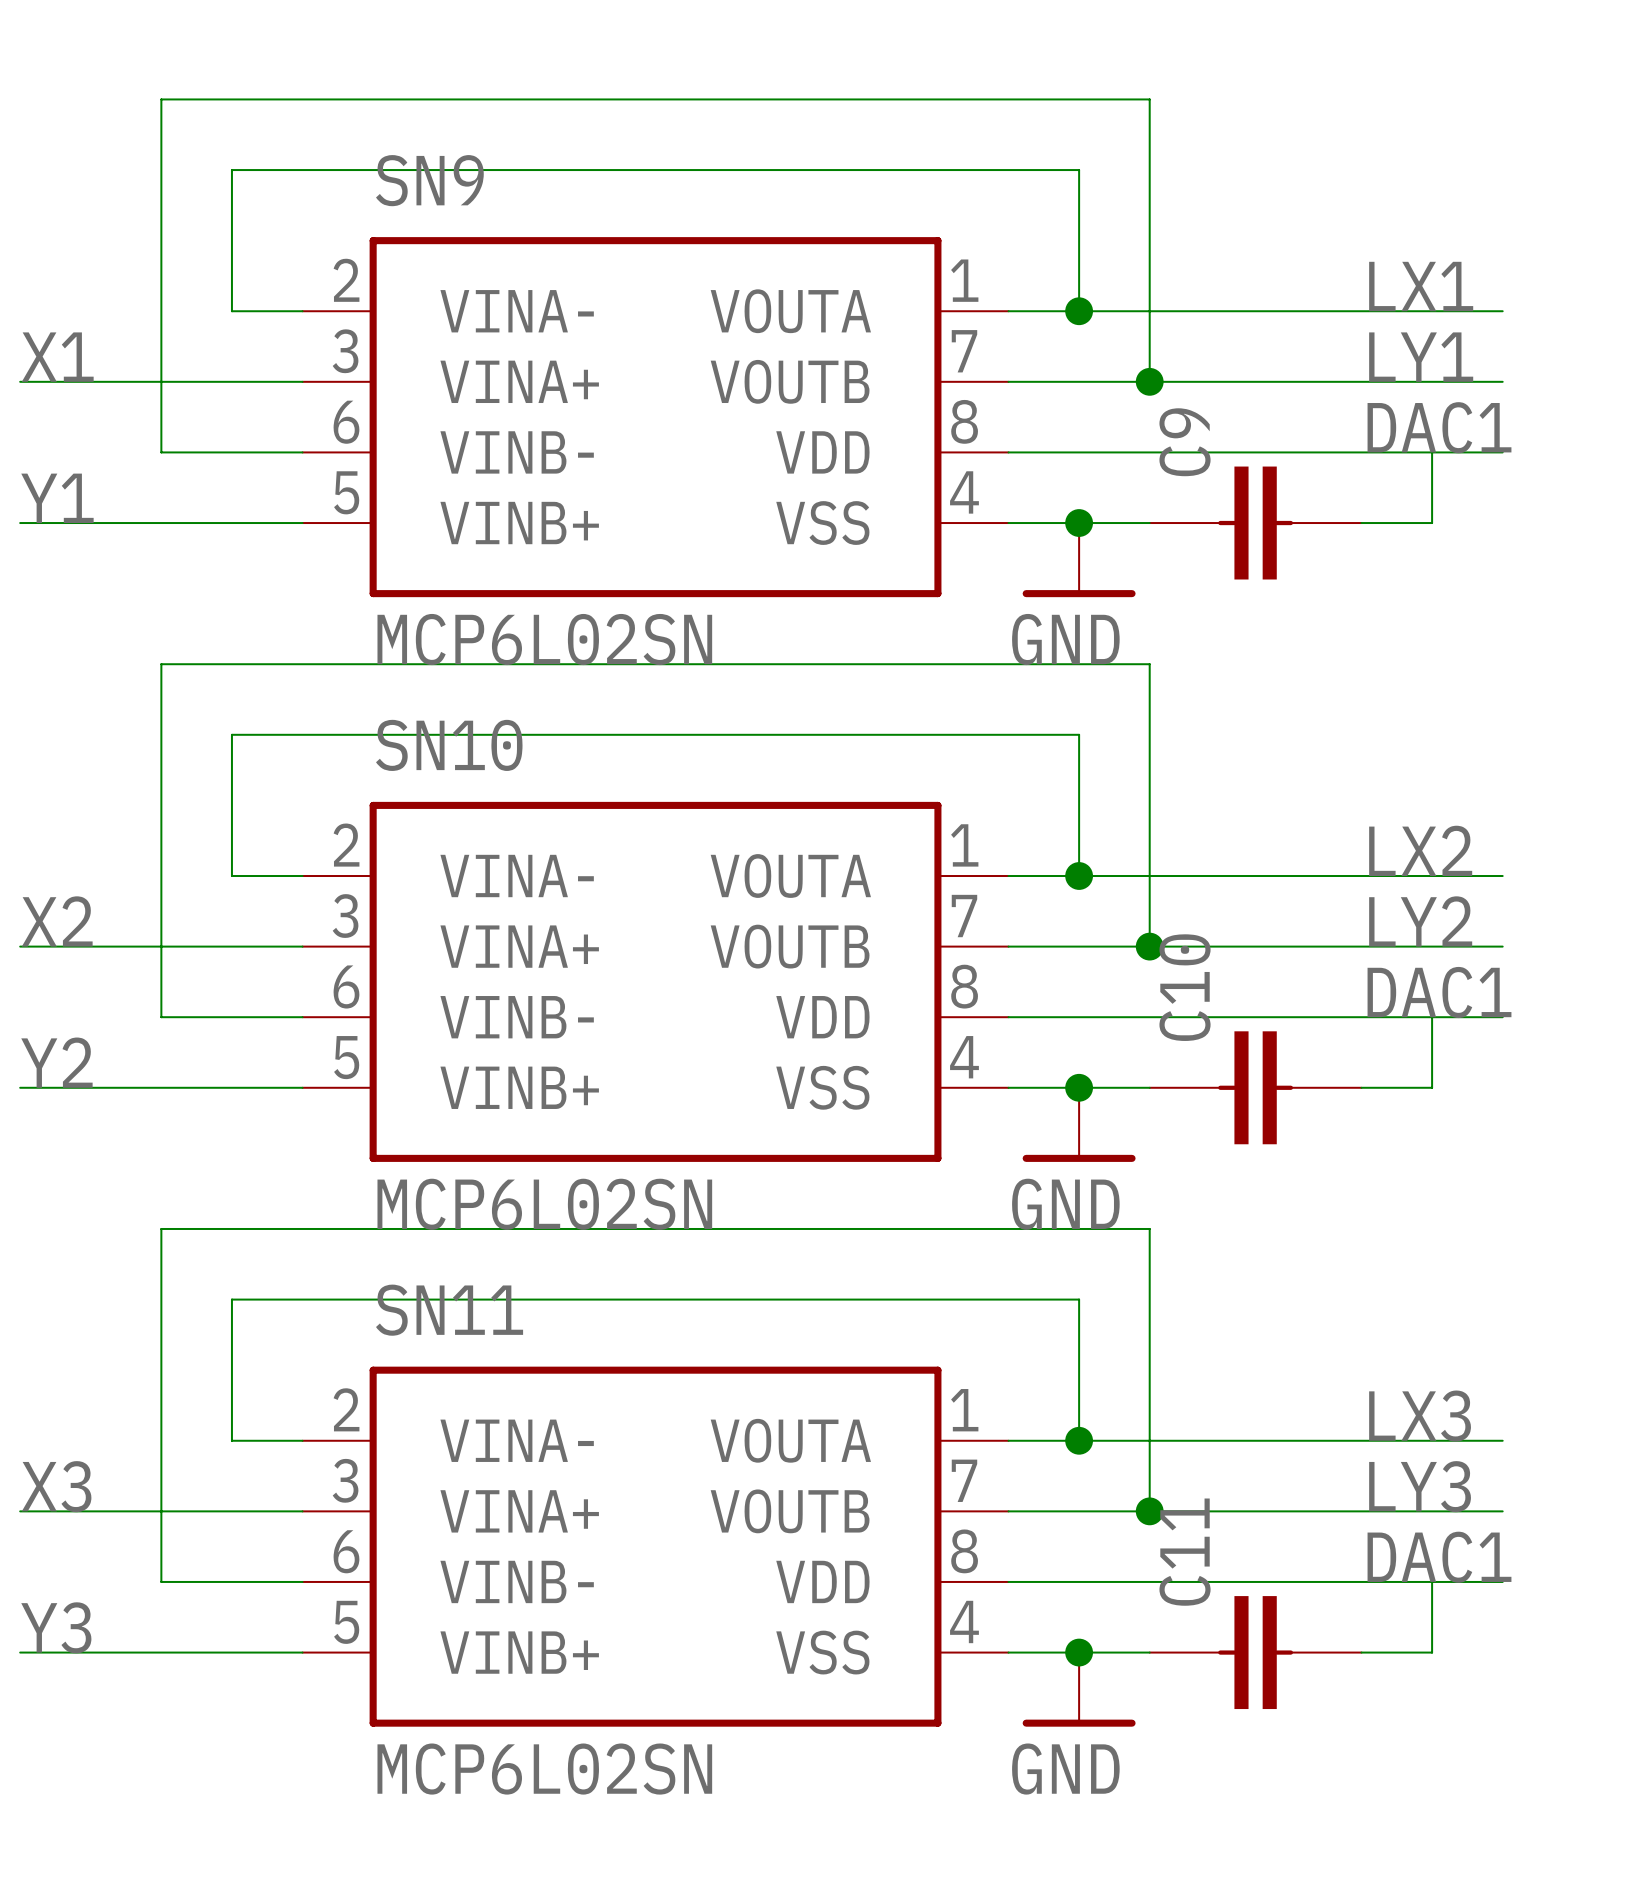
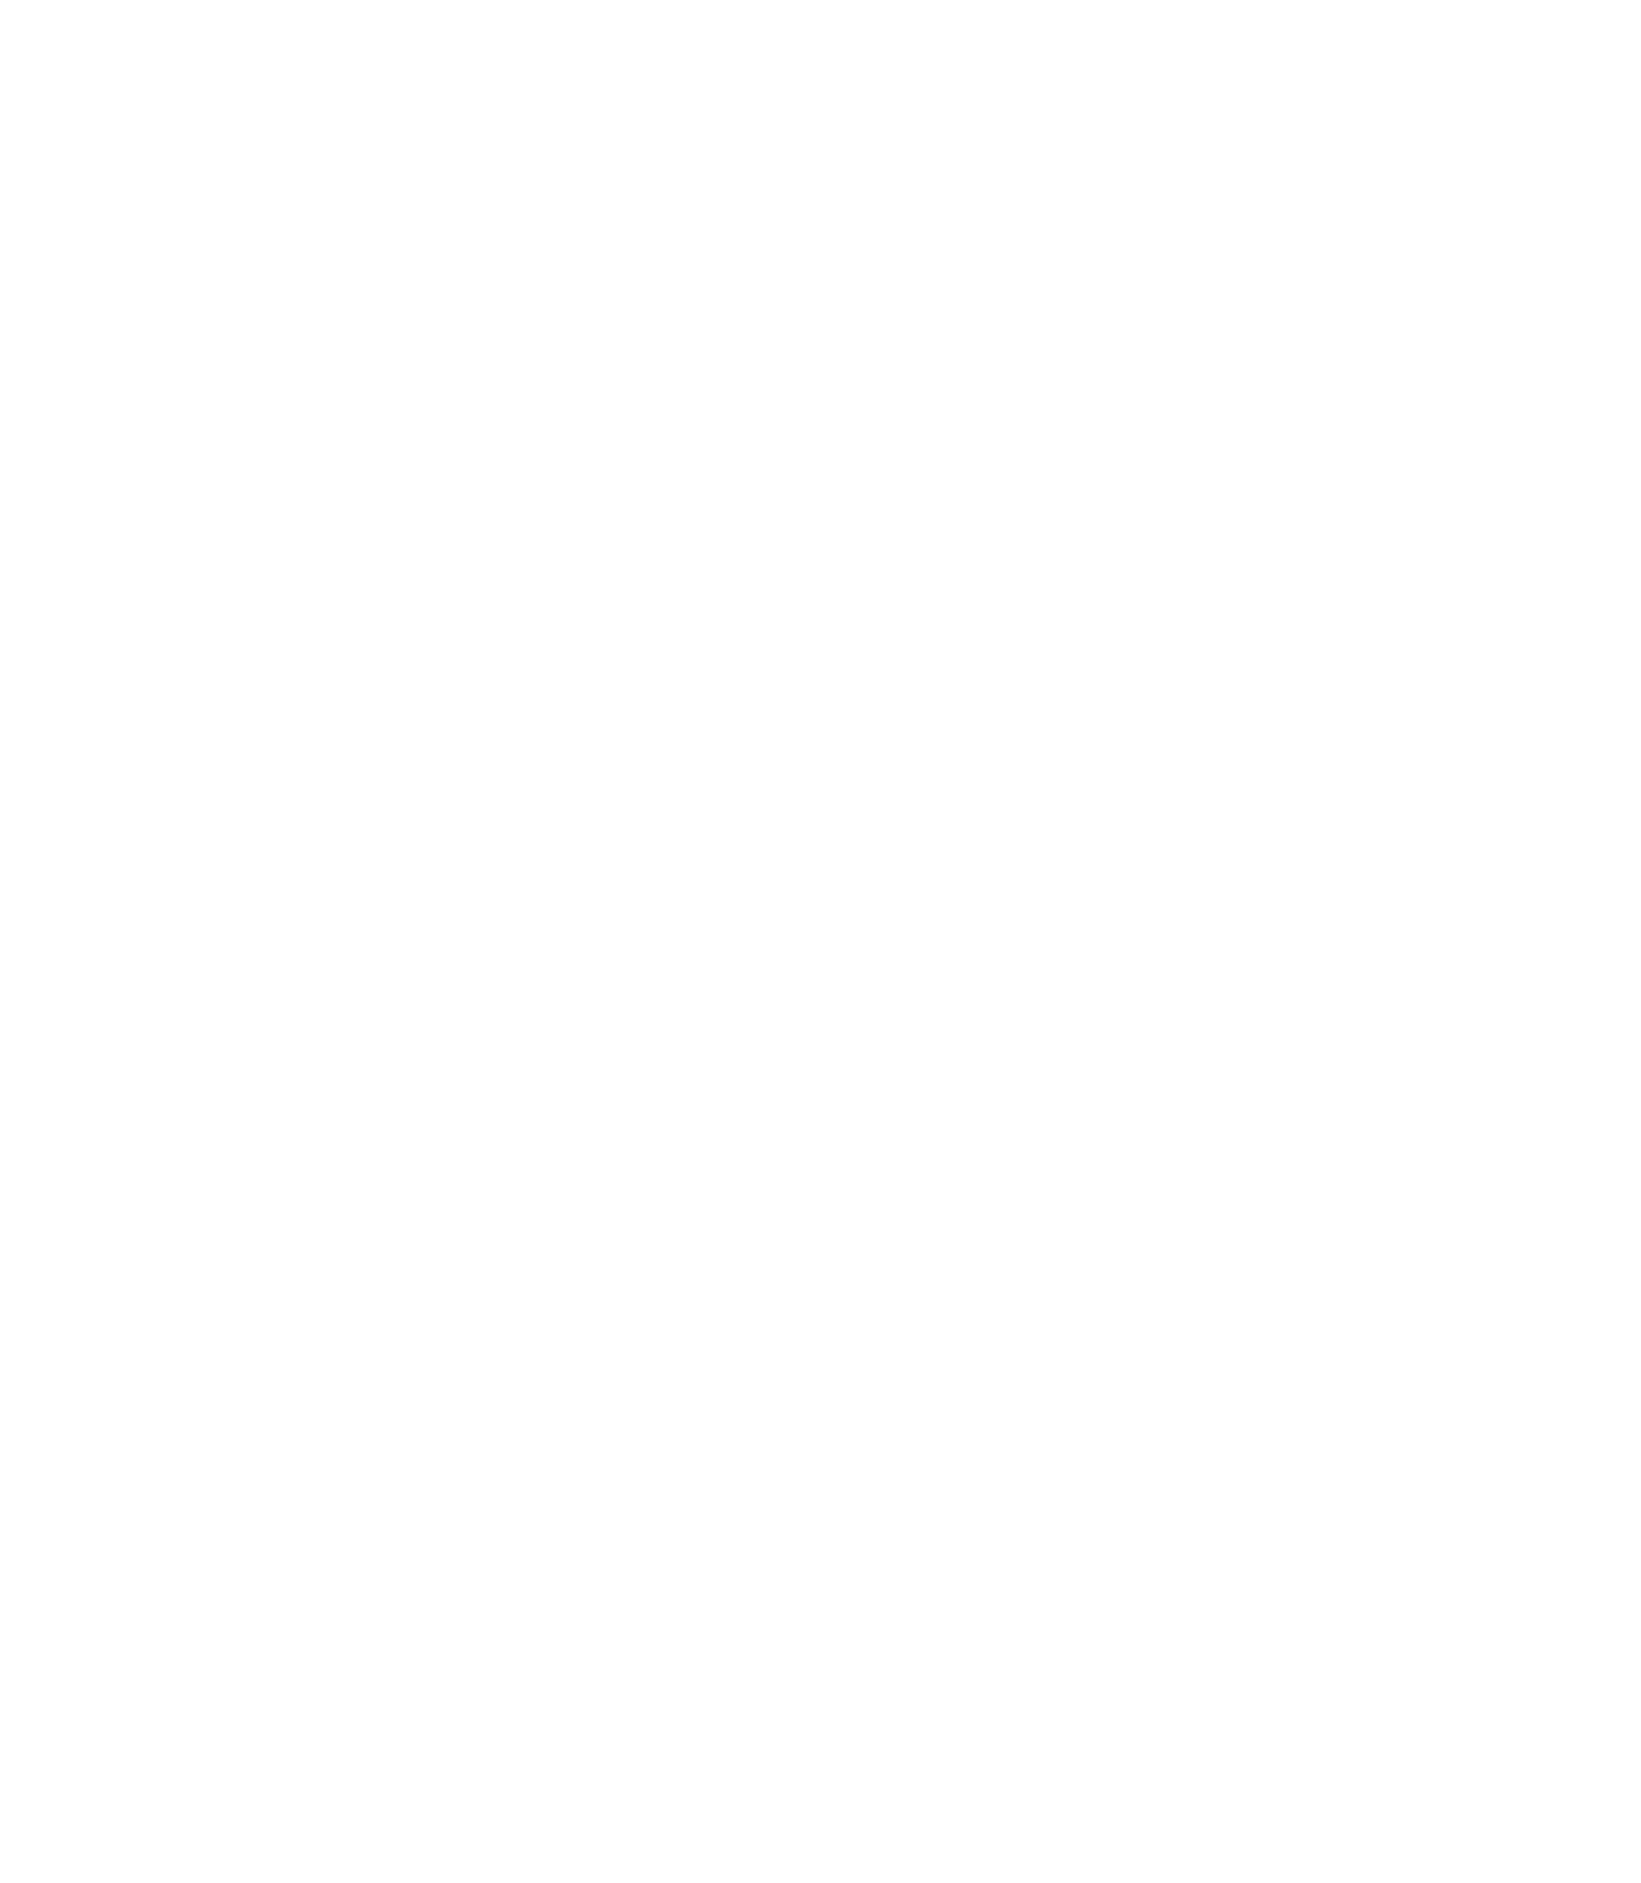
label: LX1 (1421, 286) -> none
wire: (302, 311) (231, 311) (231, 170) (1079, 170) (1079, 311) -> none
wire: (1008, 311) (1502, 311) -> none
junction: (1079, 311) -> none
label: X1 (57, 357) -> none
label: LY1 (1421, 357) -> none
wire: (20, 381) (302, 381) -> none
wire: (1008, 381) (1502, 381) -> none
wire: (1149, 381) (1149, 99) (161, 99) (161, 452) (302, 452) -> none
junction: (1149, 381) -> none
SN9: MCP6L02SN (655, 417) -> none
label: DAC1 (1439, 427) -> none
wire: (1008, 452) (1502, 452) -> none
wire: (1432, 452) (1432, 523) (1361, 523) -> none
label: Y1 (57, 498) -> none
wire: (20, 523) (302, 523) -> none
wire: (1008, 523) (1149, 523) -> none
junction: (1079, 523) -> none
C9: (1255, 523) -> none
power symbol: GND (1079, 560) -> none
label: LX2 (1420, 850) -> none
wire: (302, 876) (231, 876) (231, 734) (1079, 734) (1079, 876) -> none
wire: (1008, 876) (1502, 876) -> none
junction: (1079, 876) -> none
label: X2 (57, 921) -> none
label: LY2 (1420, 921) -> none
wire: (20, 946) (302, 946) -> none
wire: (1008, 946) (1502, 946) -> none
wire: (1149, 946) (1149, 664) (161, 664) (161, 1017) (302, 1017) -> none
junction: (1149, 946) -> none
SN10: MCP6L02SN (655, 981) -> none
label: DAC1 (1439, 992) -> none
wire: (1008, 1017) (1502, 1017) -> none
wire: (1432, 1017) (1432, 1087) (1361, 1087) -> none
label: Y2 (56, 1062) -> none
wire: (20, 1087) (302, 1087) -> none
wire: (1008, 1087) (1149, 1087) -> none
junction: (1079, 1087) -> none
C10: (1255, 1087) -> none
power symbol: GND (1079, 1124) -> none
label: LX3 (1420, 1416) -> none
wire: (302, 1440) (231, 1440) (231, 1299) (1079, 1299) (1079, 1440) -> none
wire: (1008, 1440) (1502, 1440) -> none
junction: (1079, 1440) -> none
label: X3 (56, 1486) -> none
label: LY3 (1420, 1486) -> none
wire: (20, 1511) (302, 1511) -> none
wire: (1008, 1511) (1502, 1511) -> none
wire: (1149, 1511) (1149, 1228) (161, 1228) (161, 1581) (302, 1581) -> none
junction: (1149, 1511) -> none
SN11: MCP6L02SN (655, 1546) -> none
label: DAC1 (1439, 1557) -> none
wire: (1008, 1581) (1502, 1581) -> none
wire: (1432, 1581) (1432, 1652) (1361, 1652) -> none
label: Y3 (56, 1627) -> none
wire: (20, 1652) (302, 1652) -> none
wire: (1008, 1652) (1149, 1652) -> none
junction: (1079, 1652) -> none
C11: (1255, 1652) -> none
power symbol: GND (1079, 1689) -> none

